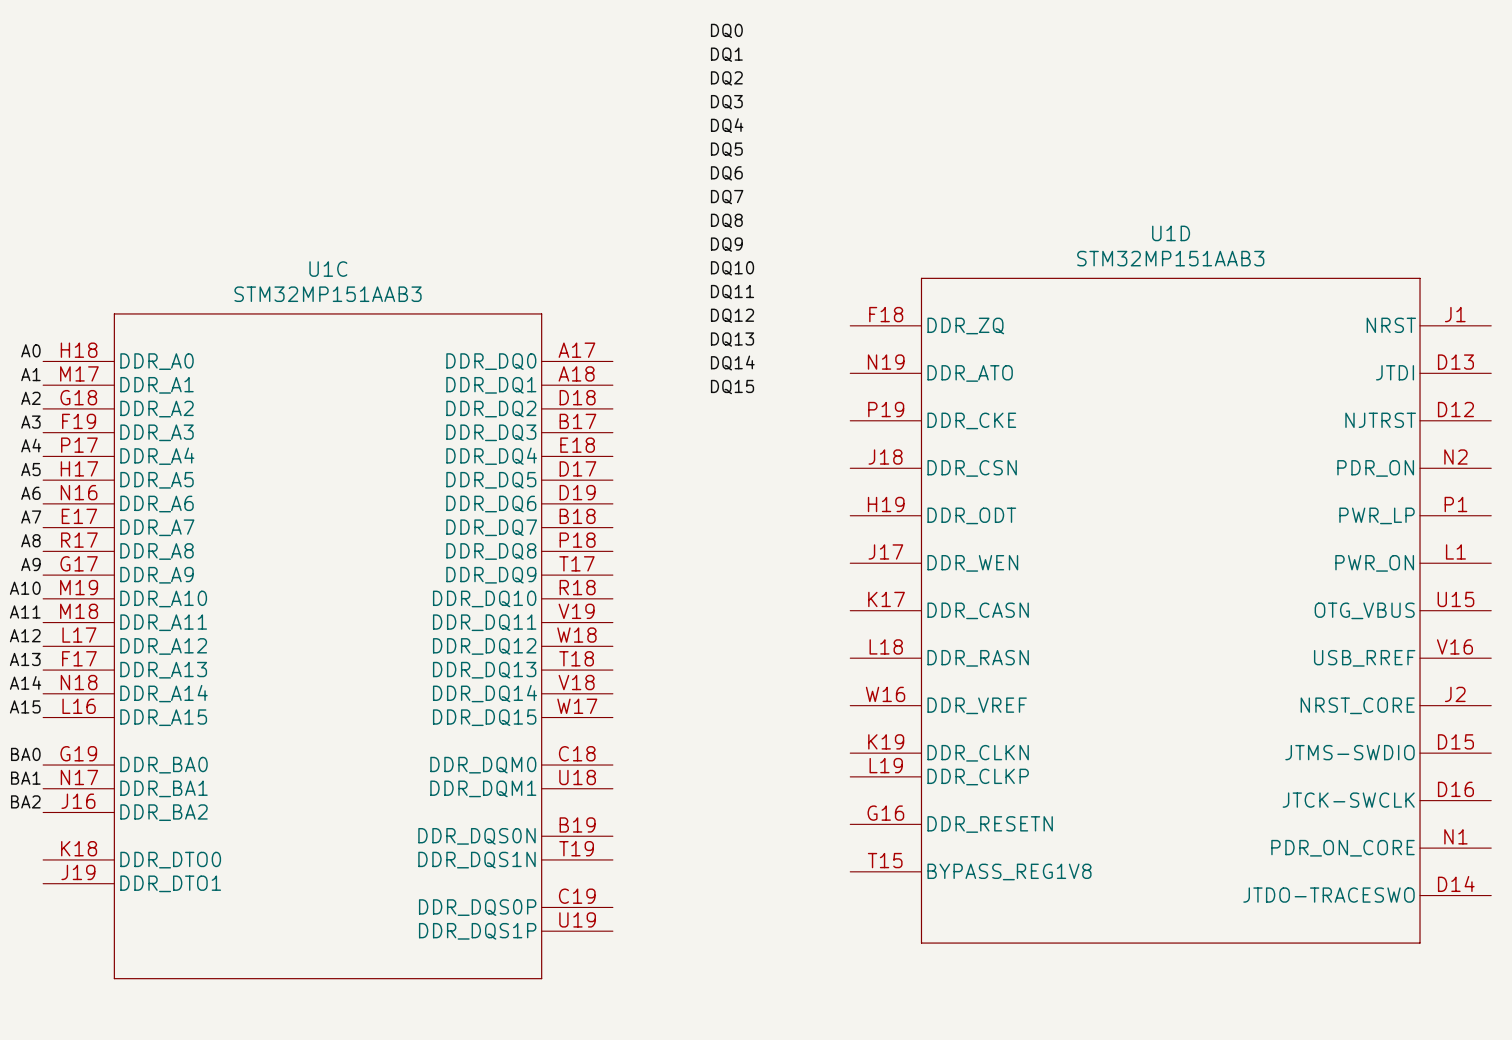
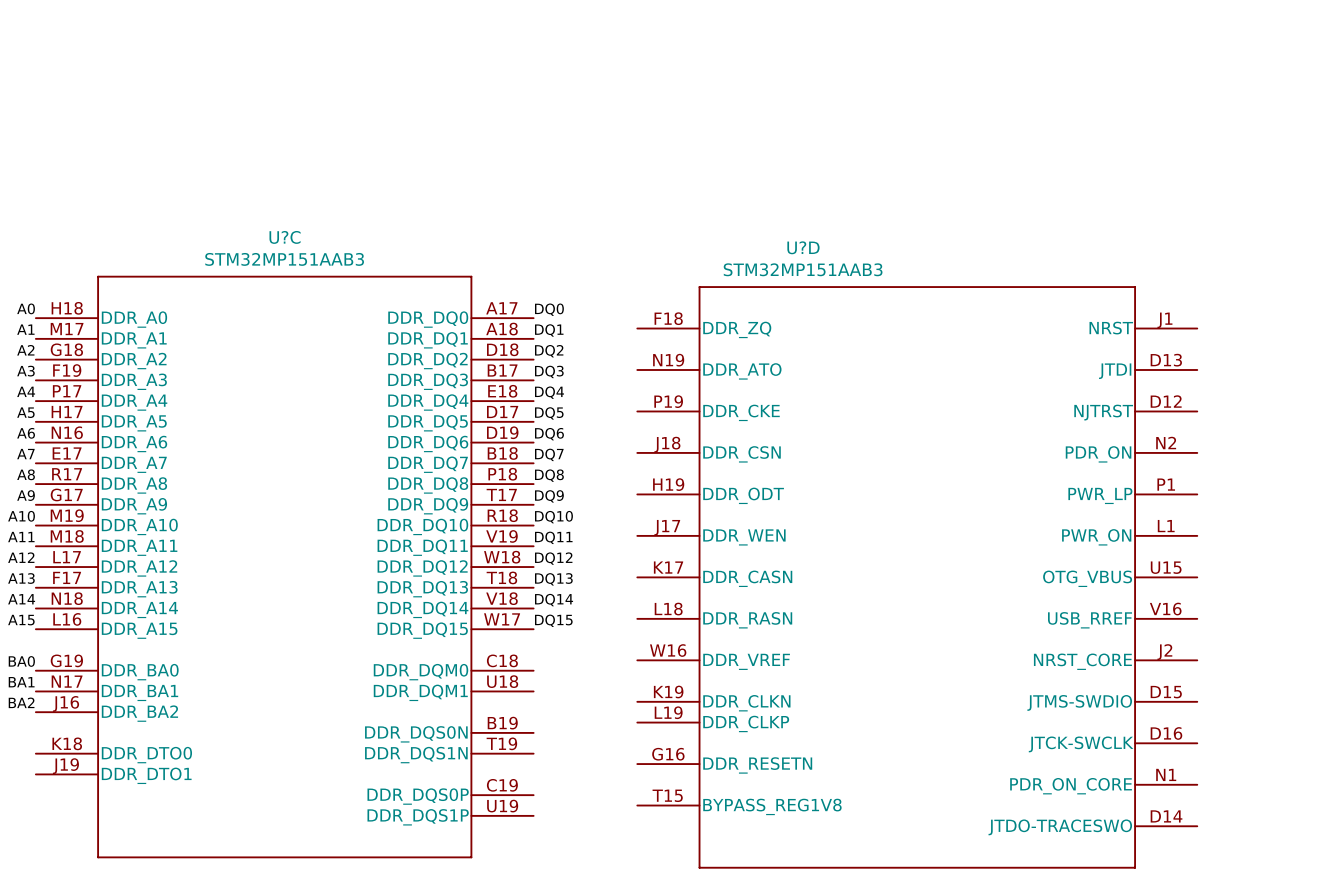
label: DQ0 (726, 30) -> none
label: DQ1 (726, 54) -> none
label: DQ2 (726, 78) -> none
label: DQ3 (726, 102) -> none
label: DQ4 (727, 125) -> none
label: DQ5 (726, 149) -> none
label: DQ6 (726, 173) -> none
label: DQ7 (727, 197) -> none
label: DQ8 (726, 220) -> none
label: DQ9 (726, 244) -> none
label: DQ10 (732, 268) -> none
U1C name: U1C (328, 269) -> U?C (285, 237)
label: DQ11 (732, 292) -> none
label: DQ12 (732, 315) -> none
label: DQ13 (732, 339) -> none
label: none -> DQ0 (549, 309)
label: DQ14 (732, 363) -> none
label: none -> DQ1 (549, 330)
label: DQ15 (732, 387) -> none
label: none -> DQ2 (549, 351)
label: none -> DQ3 (549, 371)
label: none -> DQ4 (549, 392)
label: none -> DQ5 (549, 413)
label: none -> DQ6 (549, 434)
label: none -> DQ7 (549, 454)
label: none -> DQ8 (549, 475)
label: none -> DQ9 (549, 496)
label: none -> DQ10 (553, 517)
U1D: STM32MP151AAB3 (1170, 610) -> none
label: none -> DQ11 (553, 537)
label: none -> DQ12 (553, 558)
U?D: none -> STM32MP151AAB3 (917, 577)
label: none -> DQ13 (553, 579)
label: none -> DQ14 (554, 600)
label: none -> DQ15 (553, 620)

